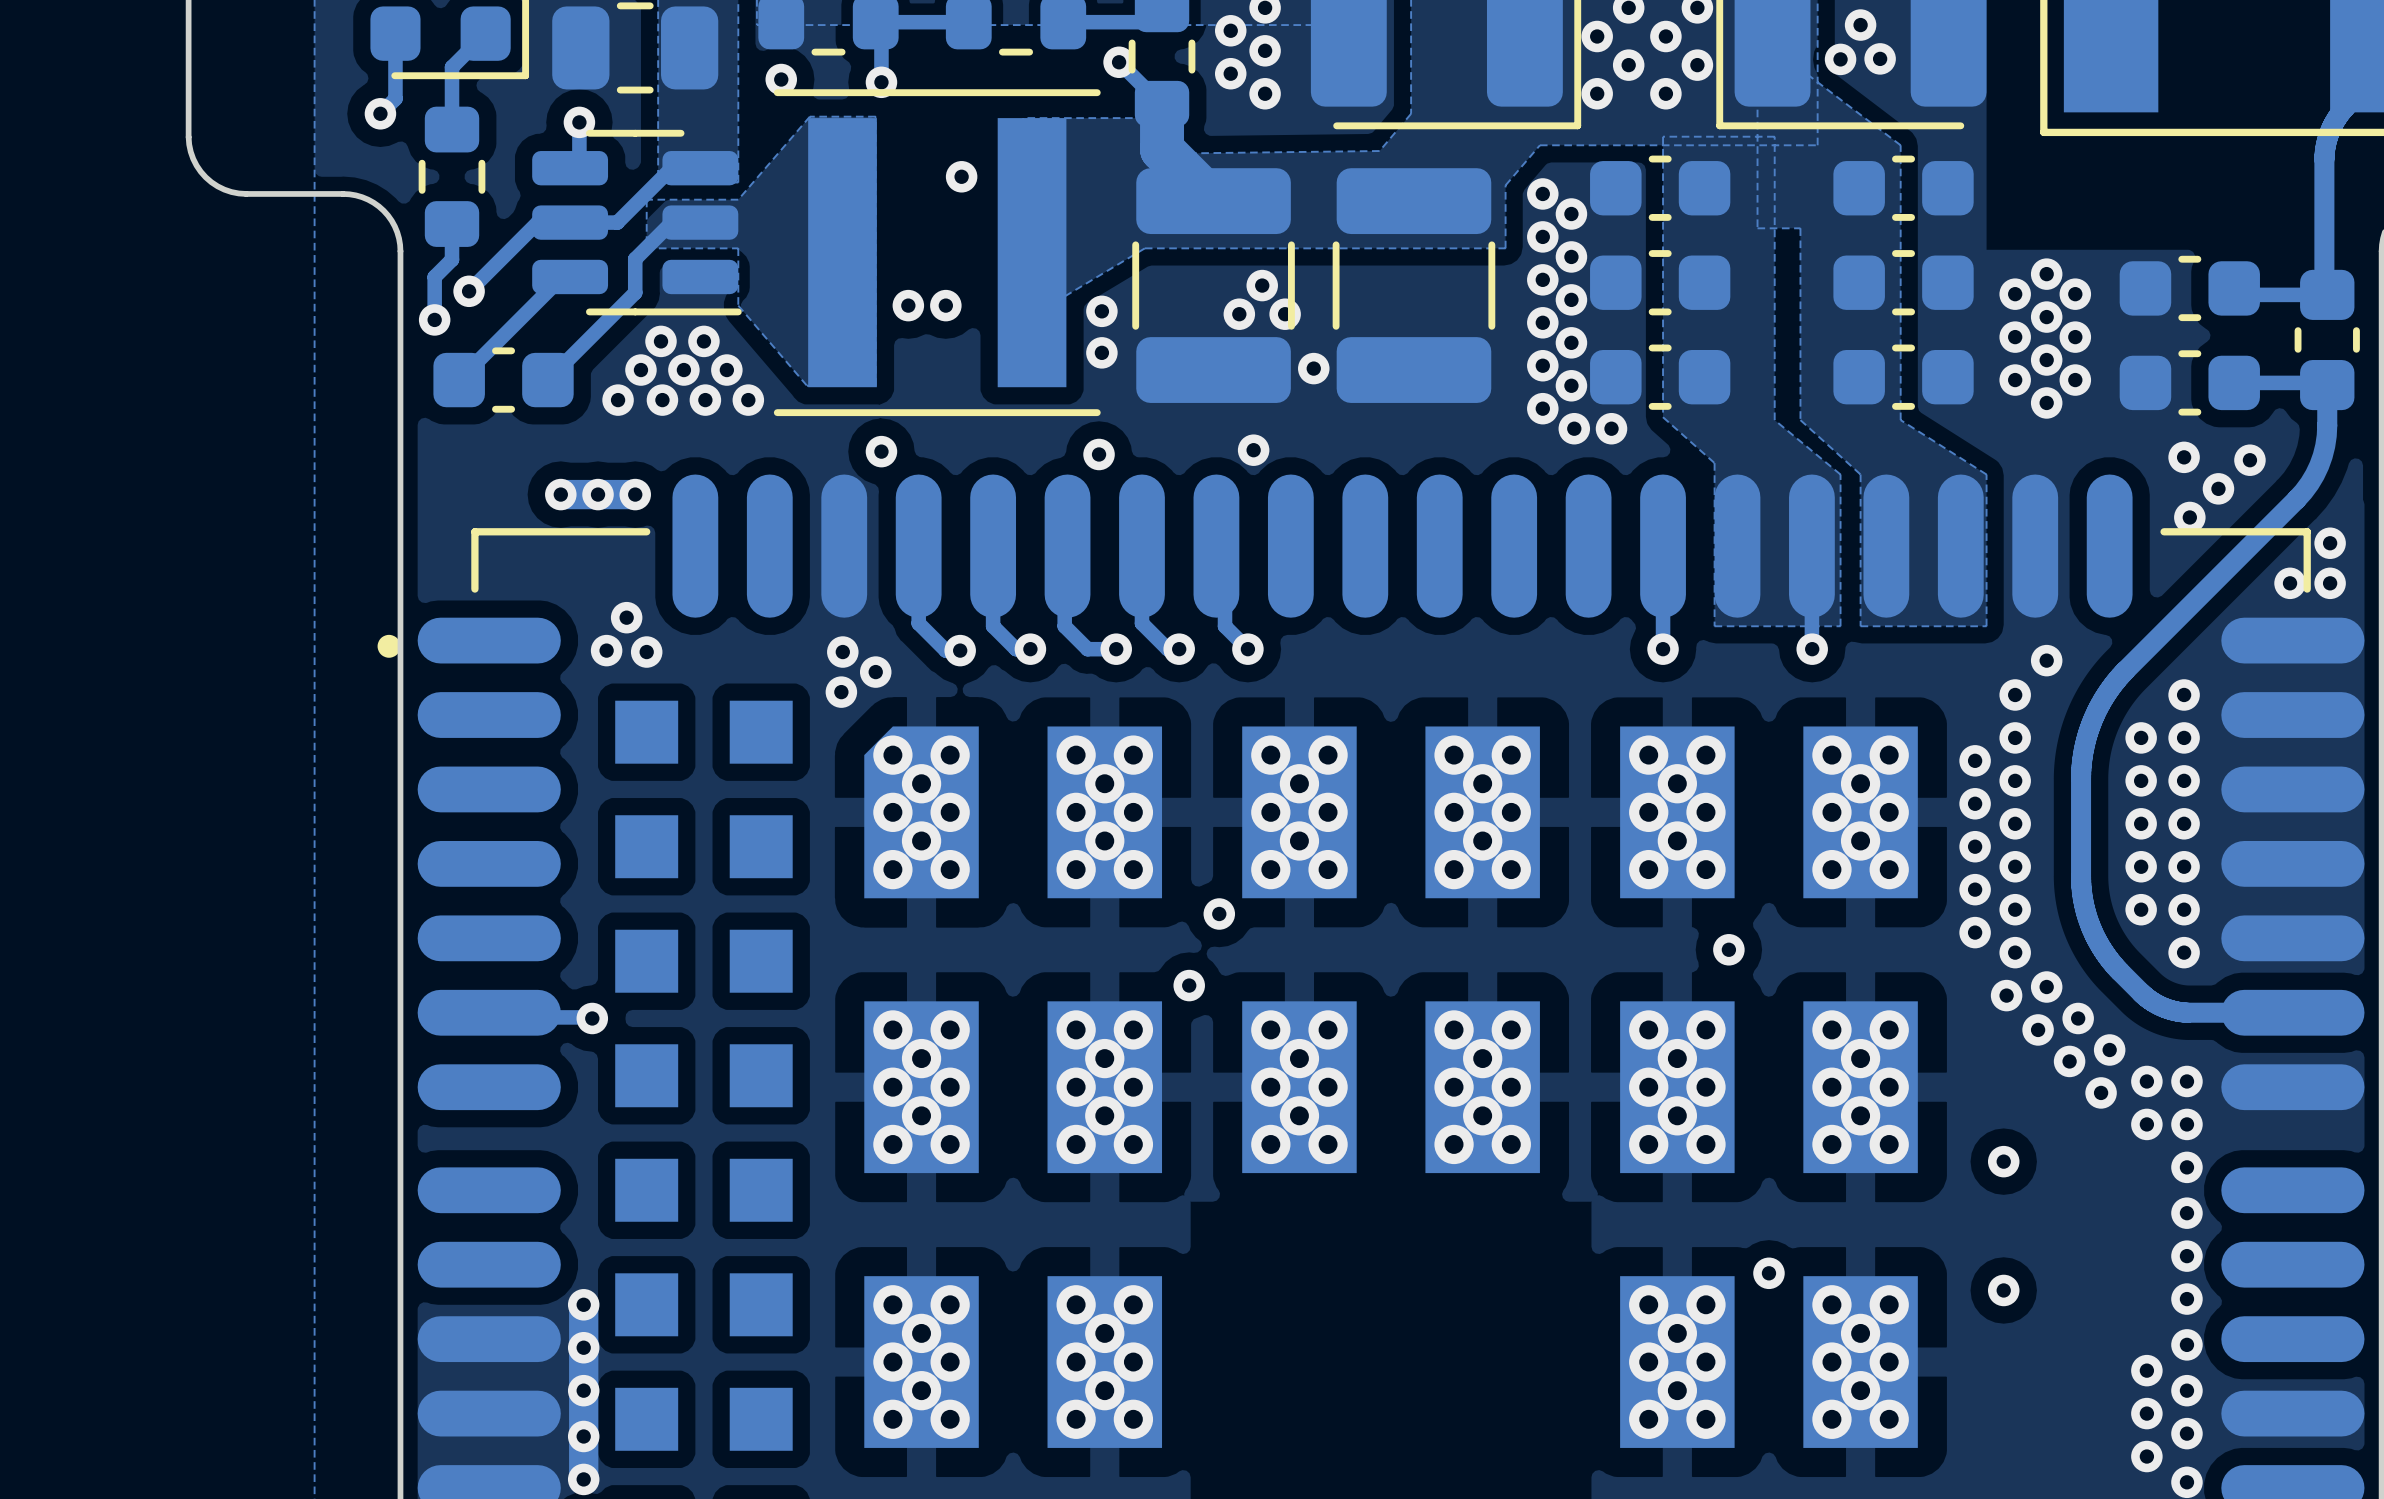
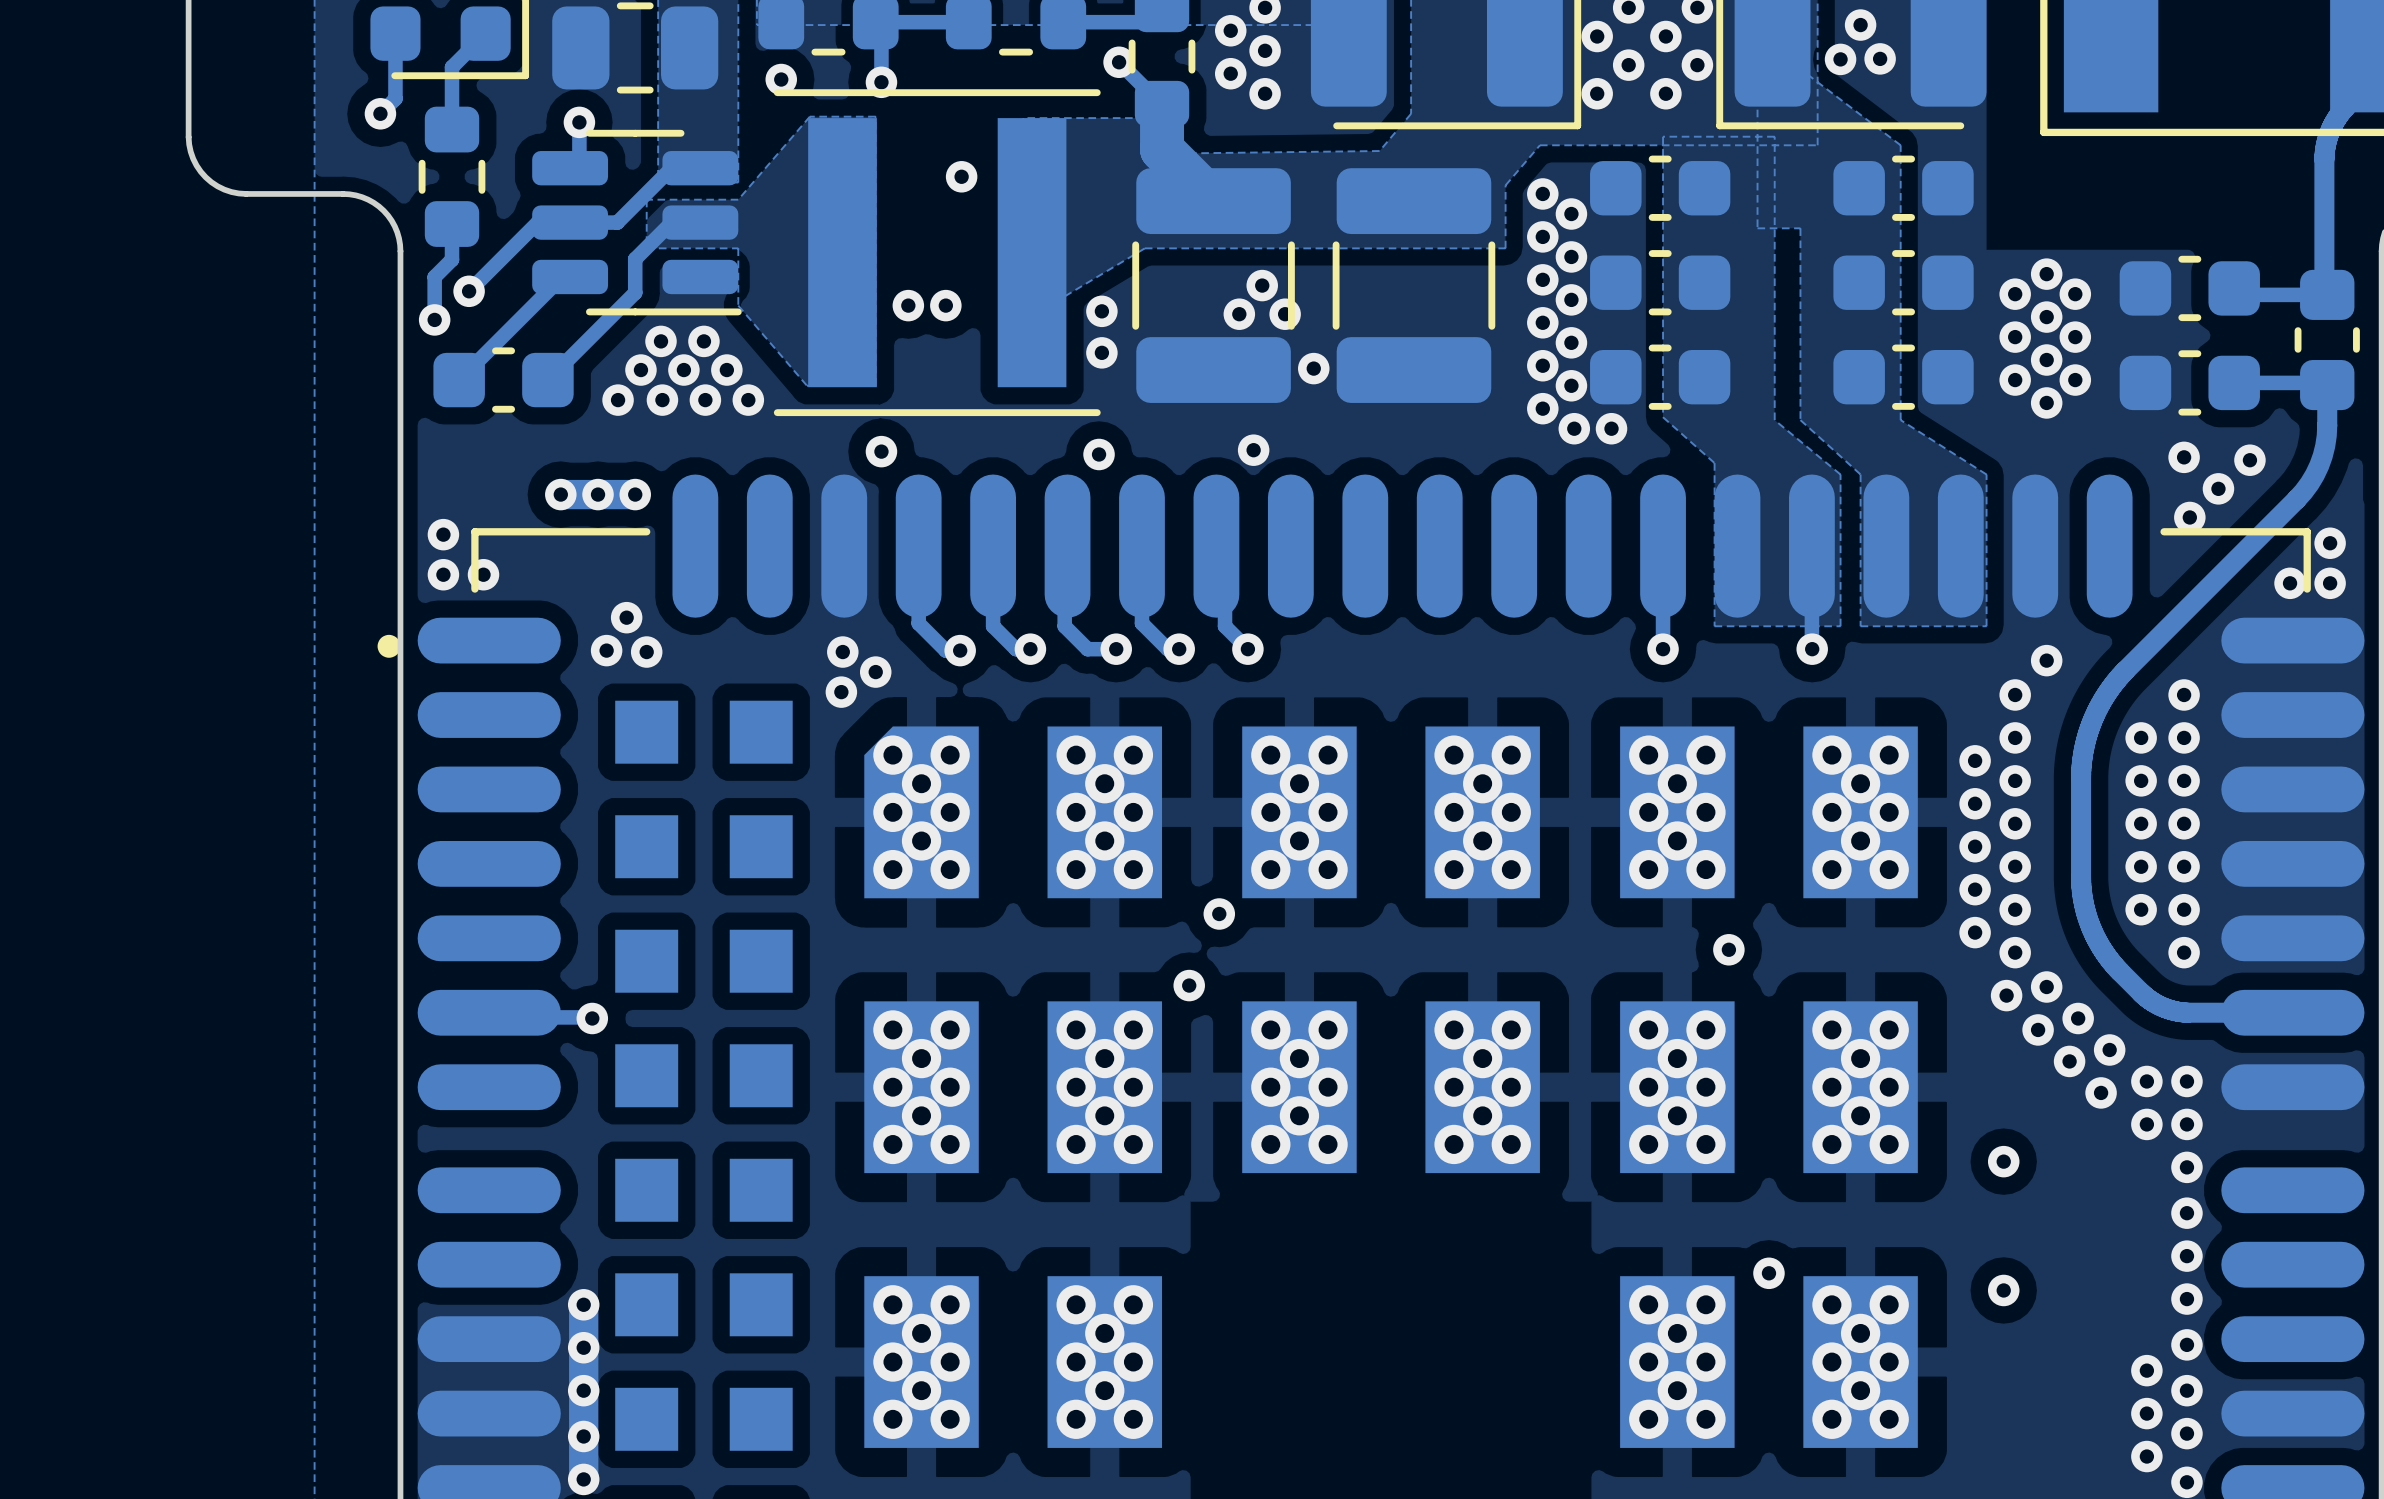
via: none -> (443, 534)
via: none -> (443, 574)
via: none -> (483, 574)

